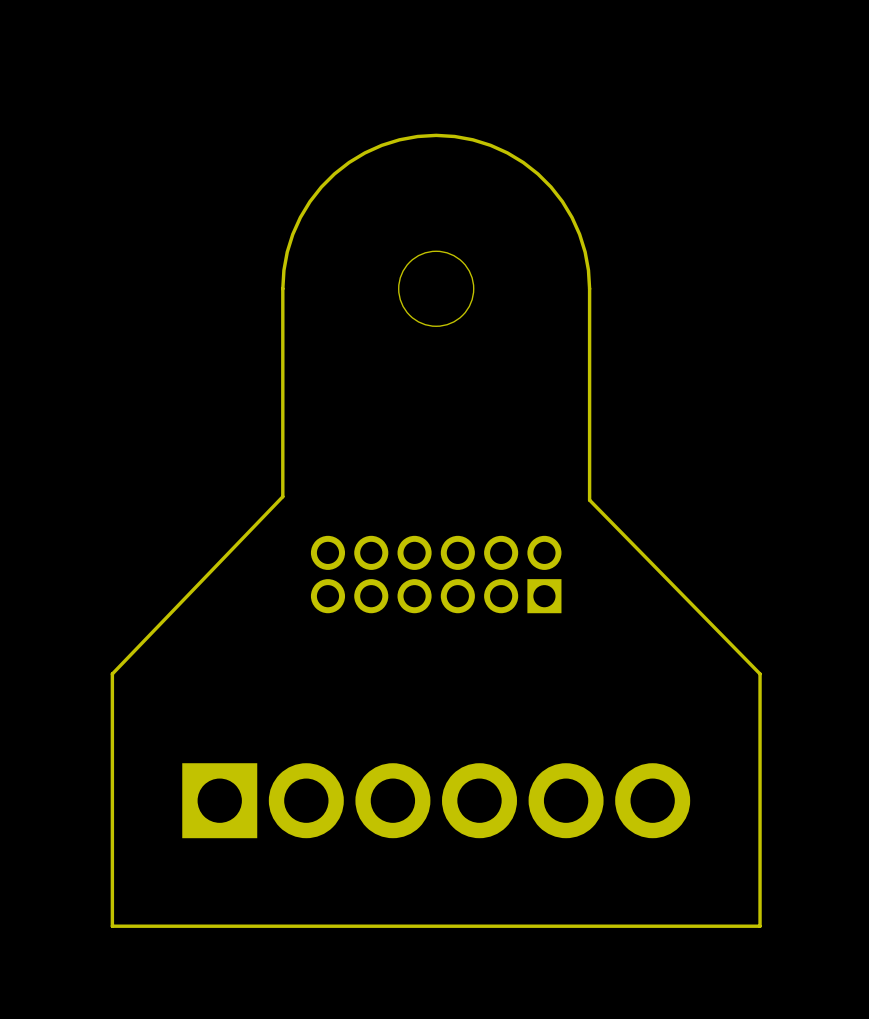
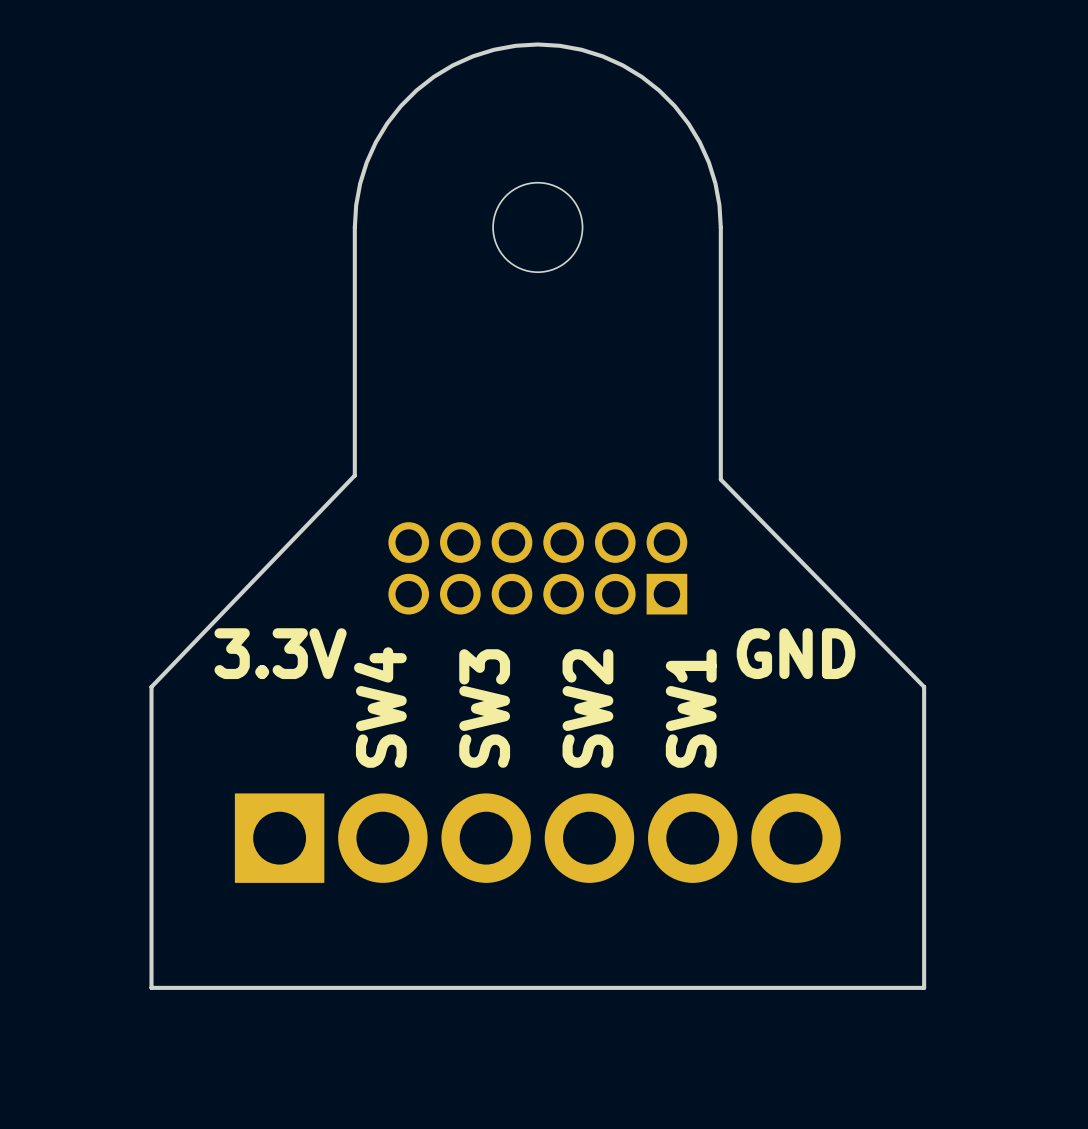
text: none -> 3.3V (280, 653)
text: none -> GND (796, 653)
text: none -> SW4 (380, 707)
text: none -> SW3 (484, 708)
text: none -> SW2 (587, 708)
text: none -> SW1 (691, 708)

